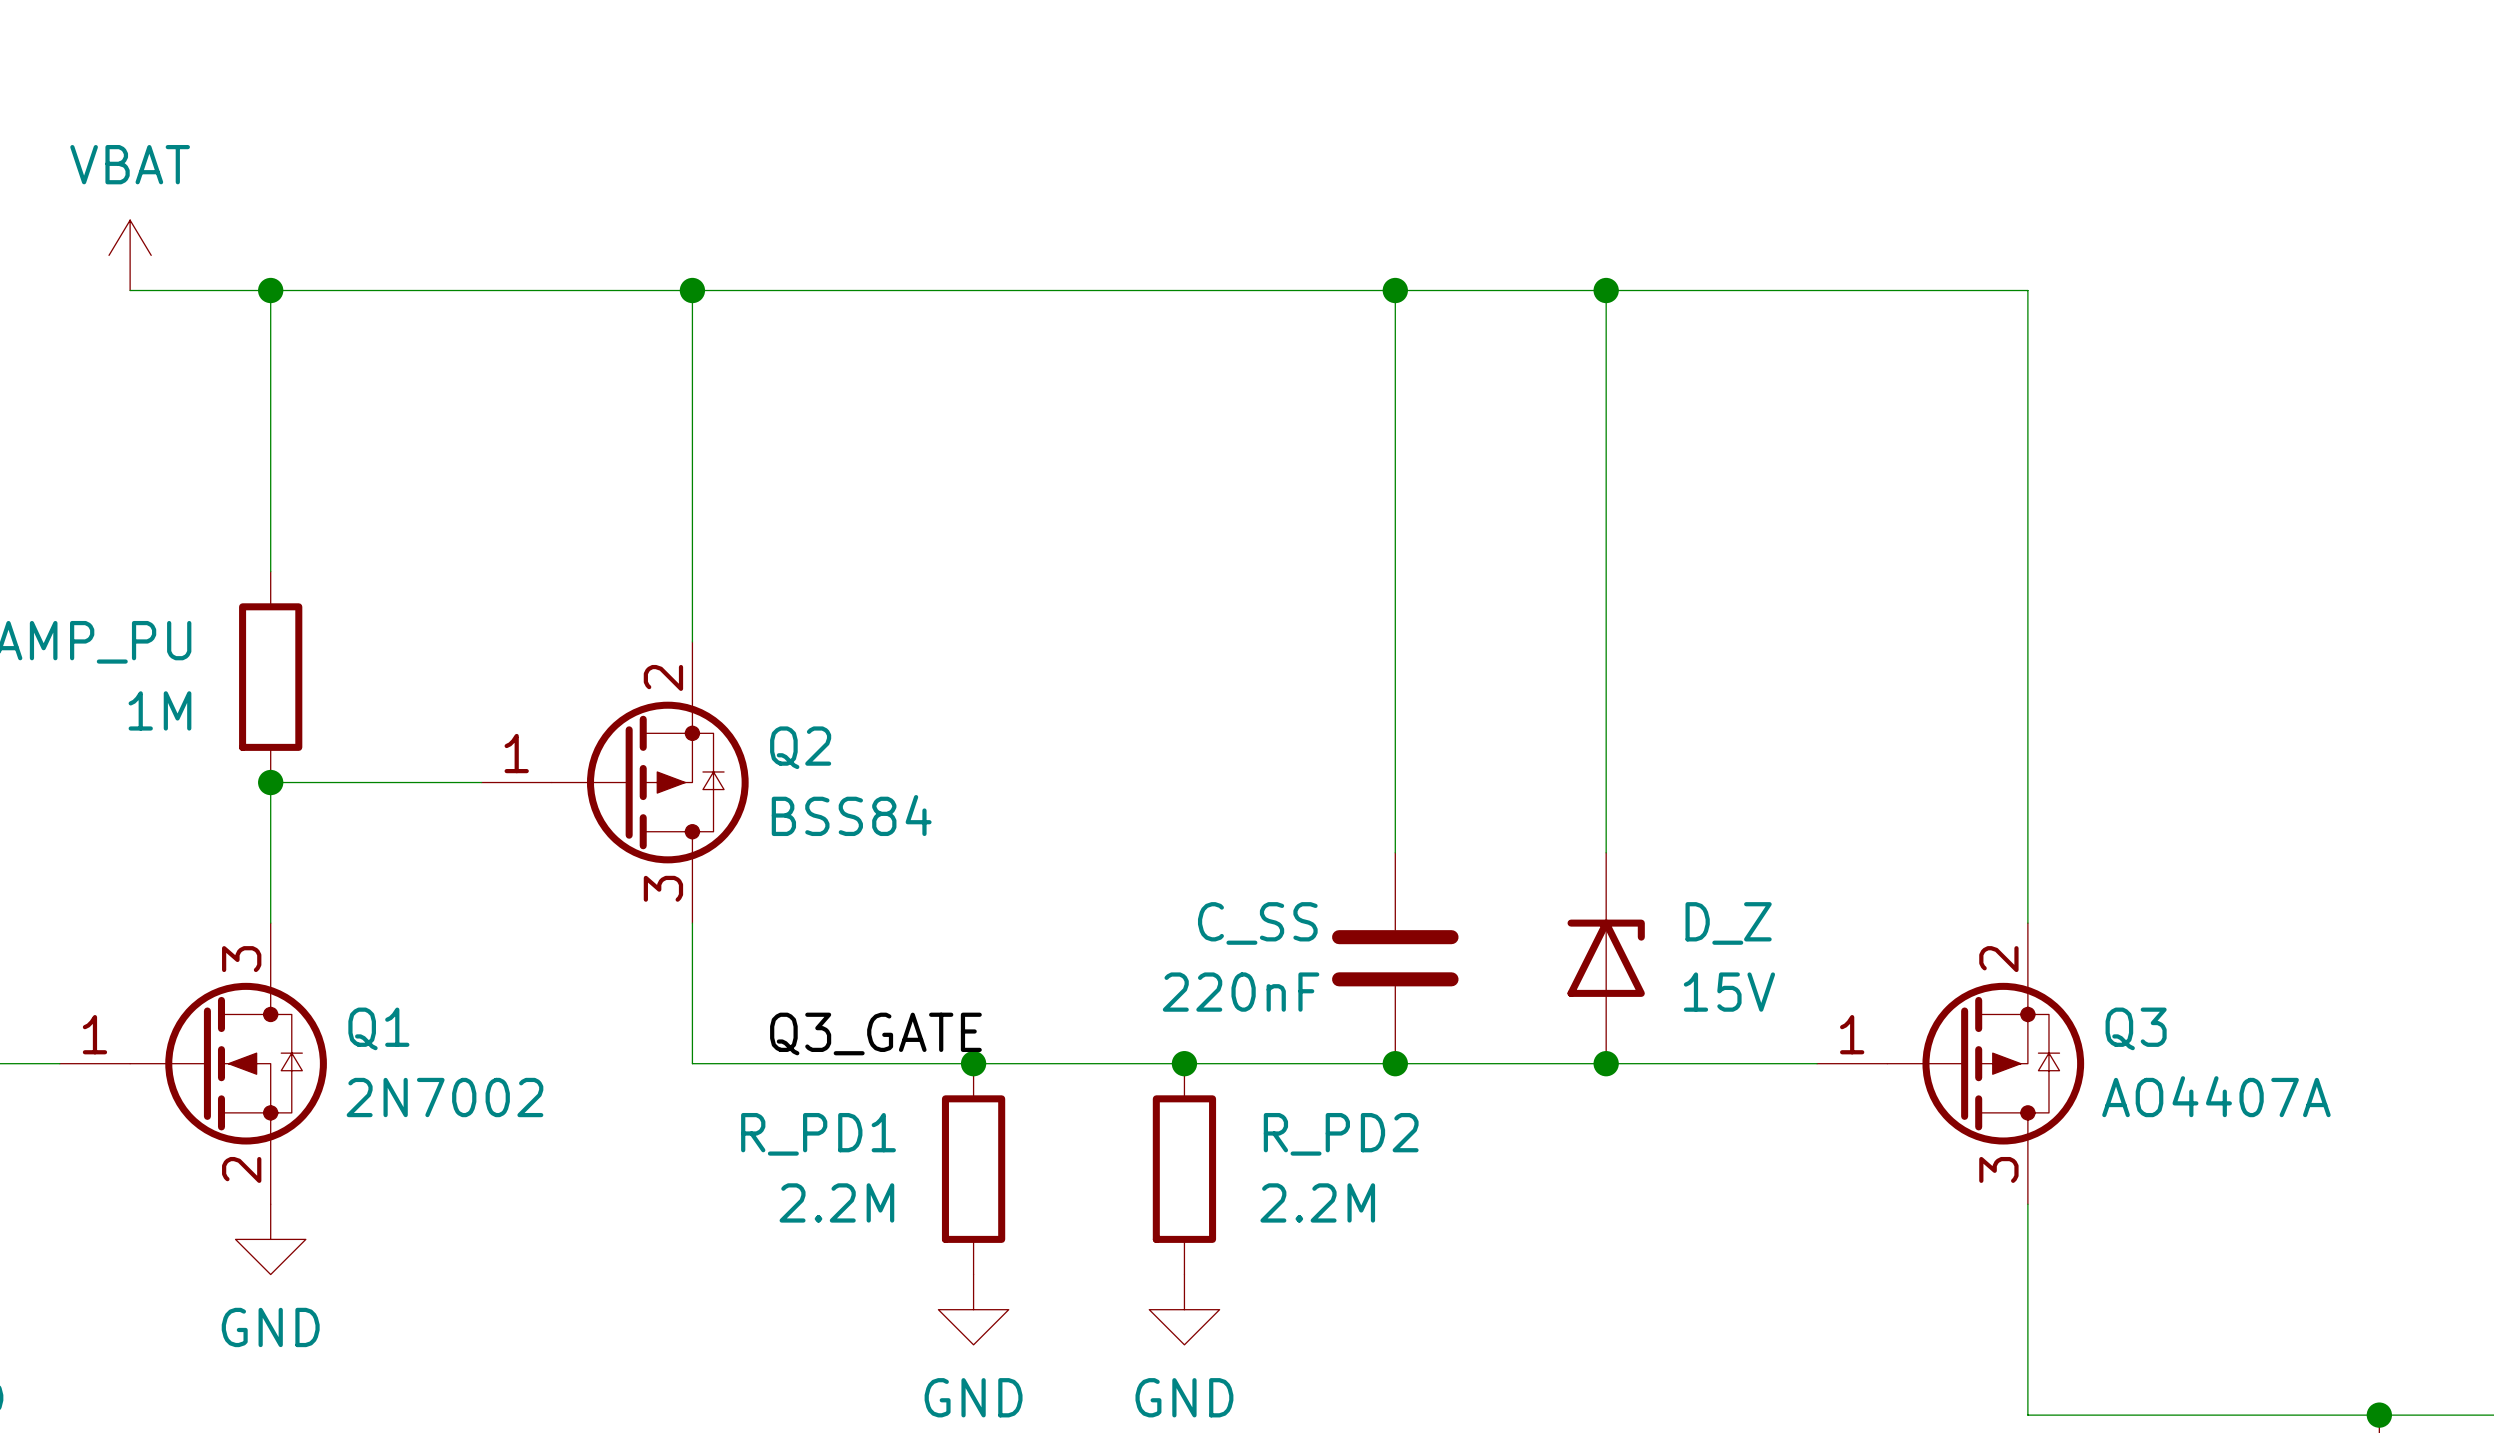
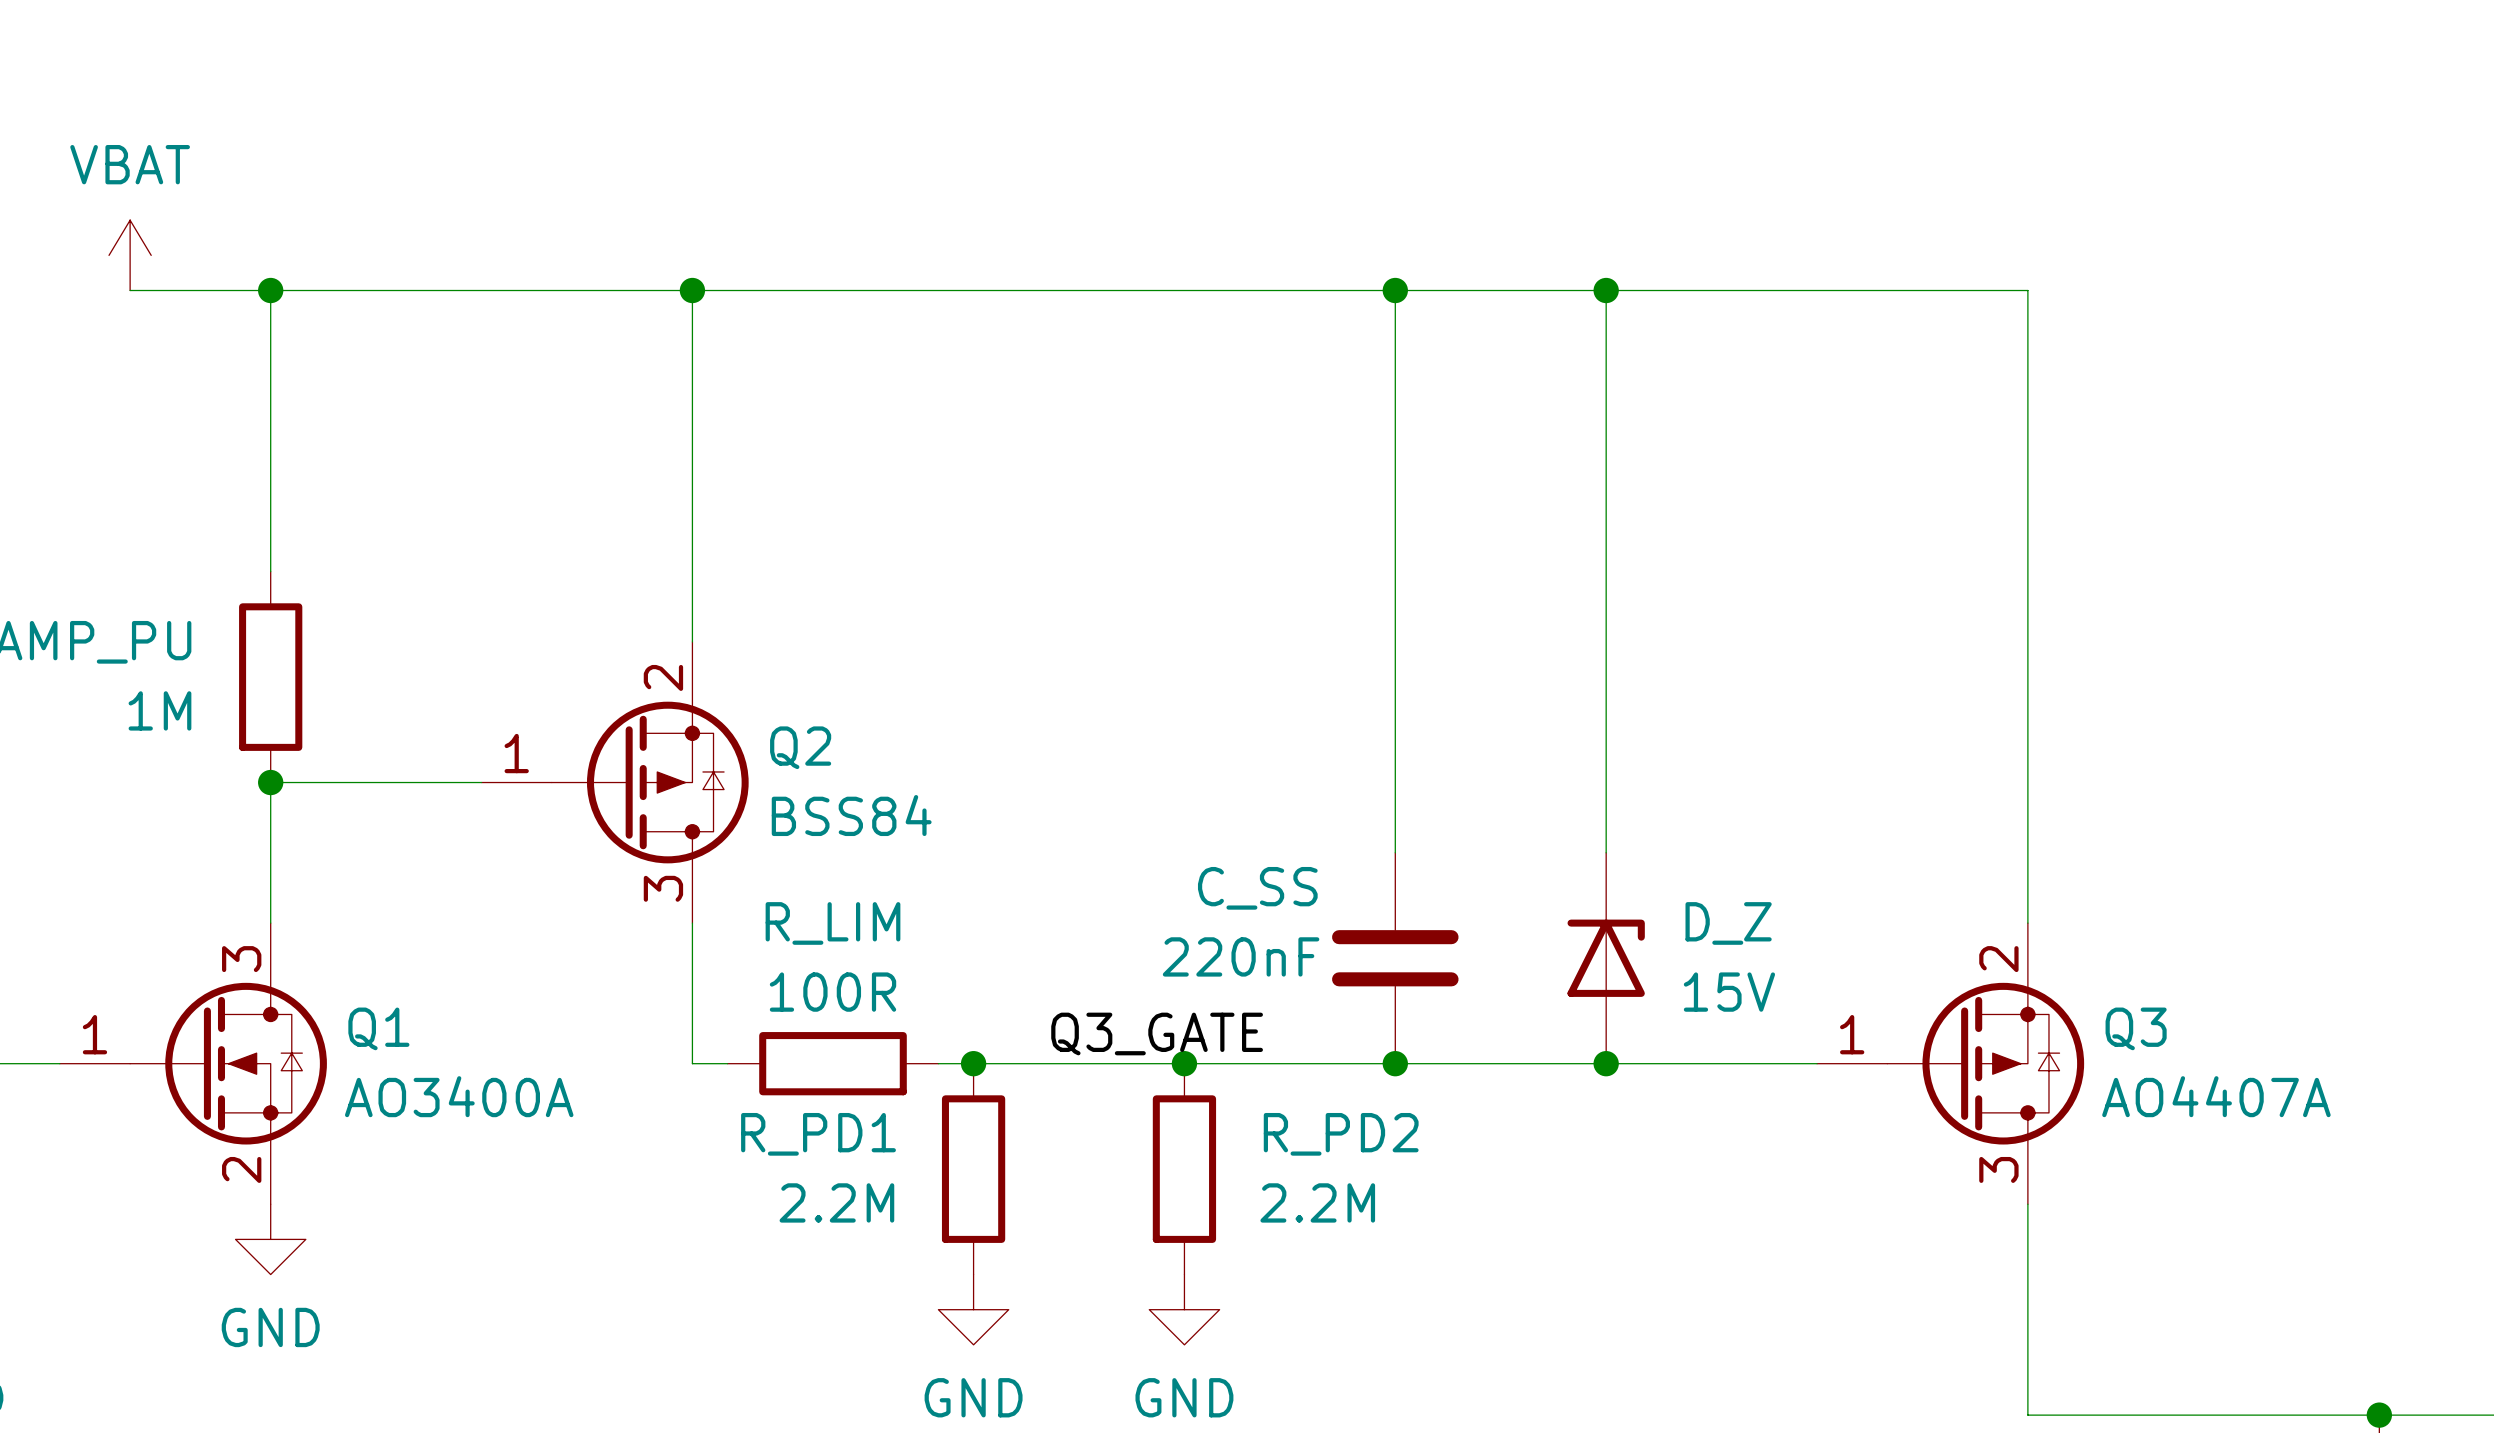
C_SS name position: C_SS (1257, 923) -> C_SS (1257, 888)
C_SS value position: 220nF (1241, 992) -> 220nF (1241, 956)
label position: Q3_GATE (875, 1033) -> Q3_GATE (1157, 1033)
wire: (727, 1063) (938, 1063) -> none
R_LIM: none -> 100R (833, 1063)
Q1 value: 2N7002 (445, 1097) -> AO3400A (459, 1096)

